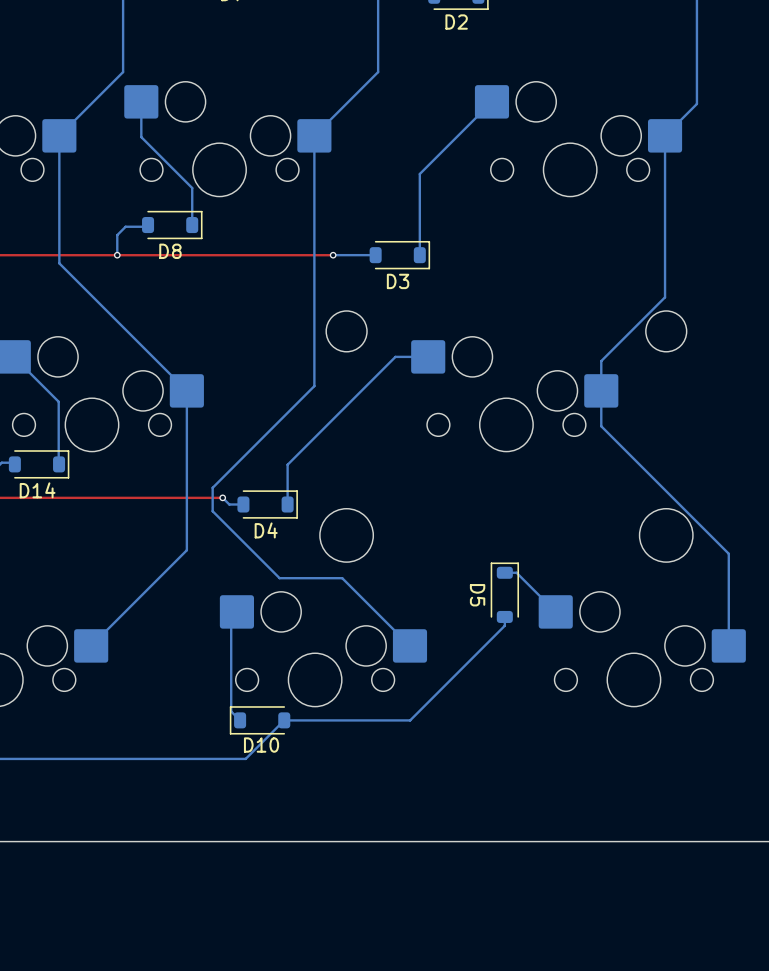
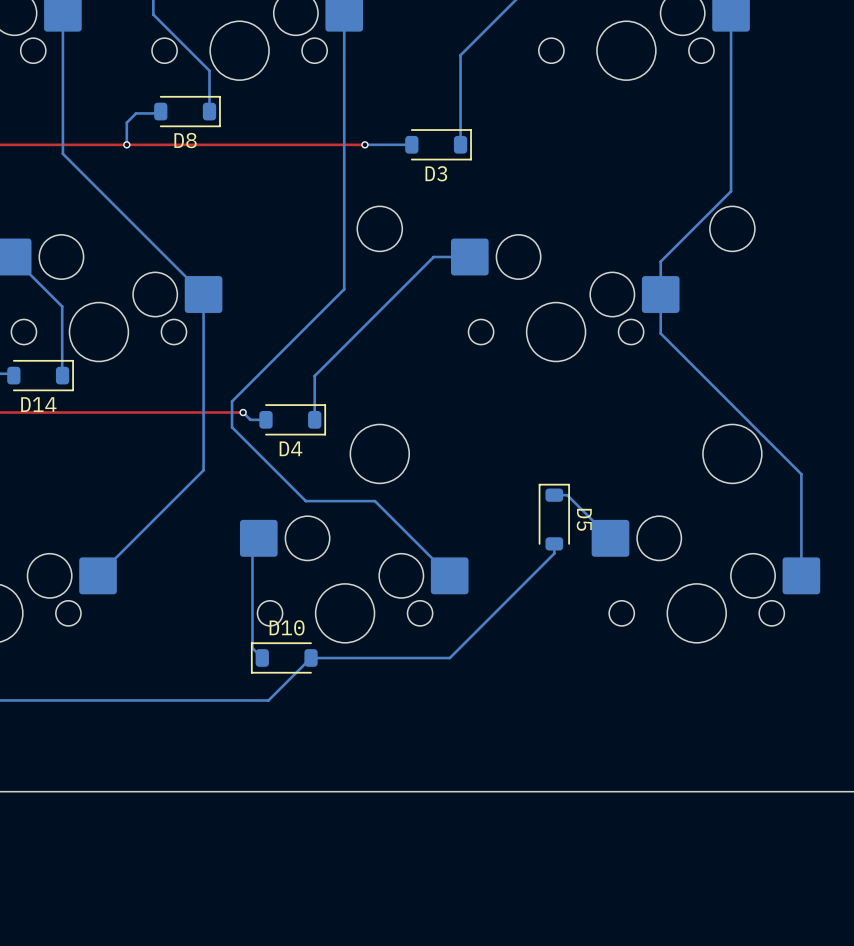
D5 name position: D5 (477, 595) -> D5 (584, 519)
D10 name position: D10 (261, 745) -> D10 (287, 627)

